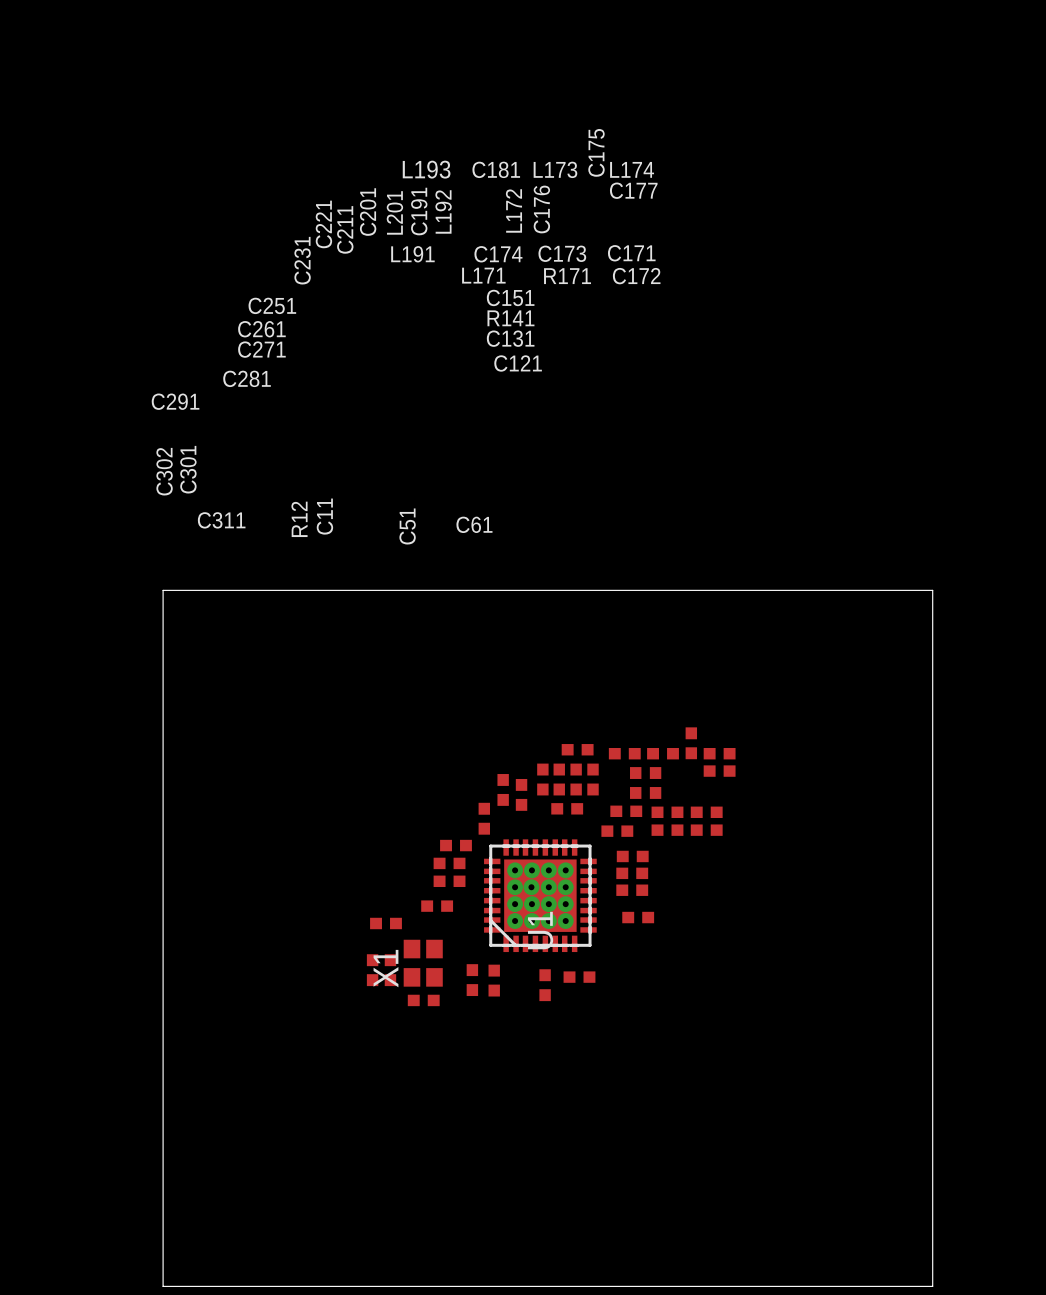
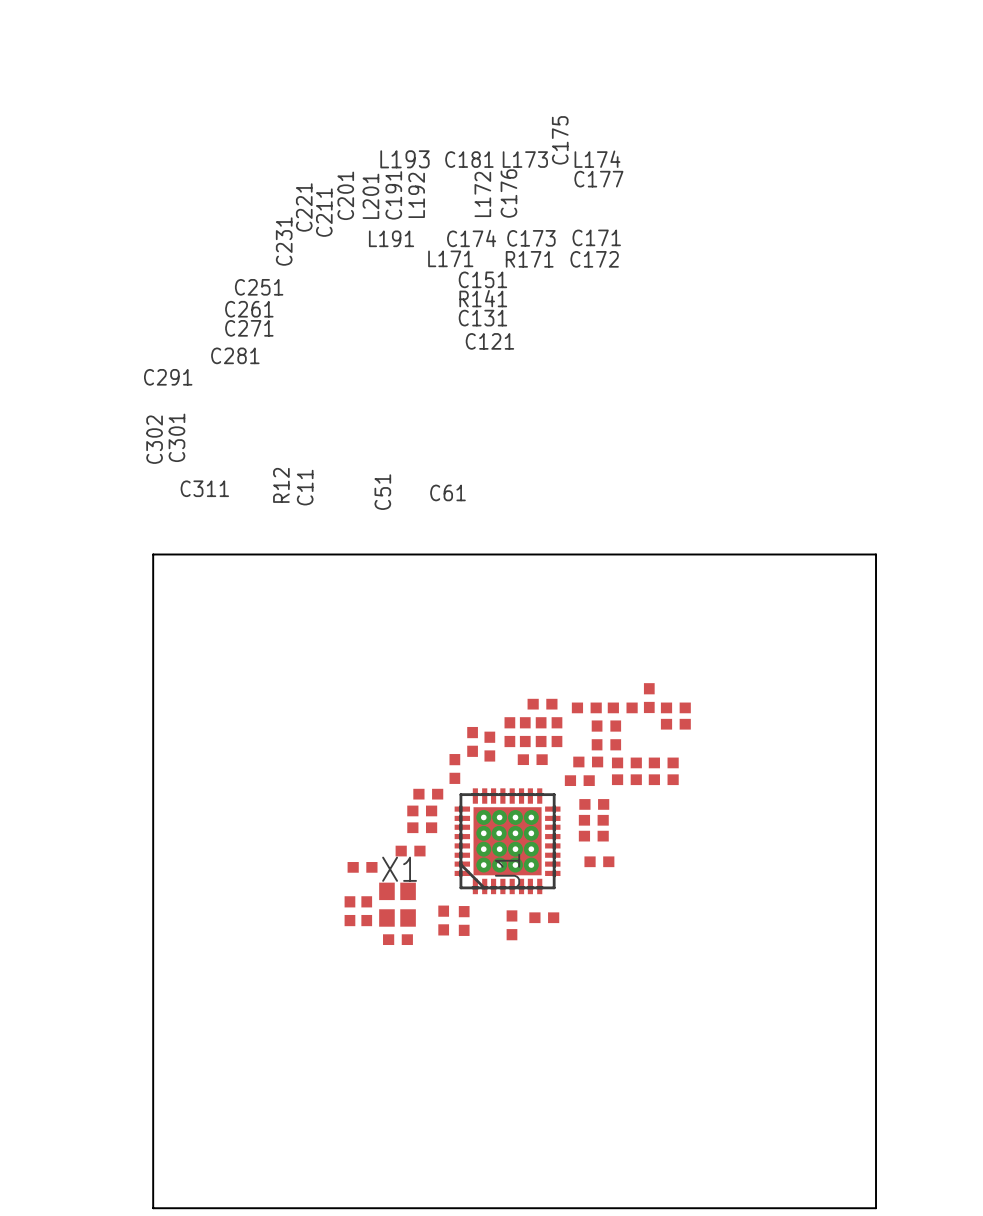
X1 name rotation: 0° (386, 968) -> 90° clockwise (399, 869)
X1 name position: X1 (386, 968) -> X1 (399, 869)

